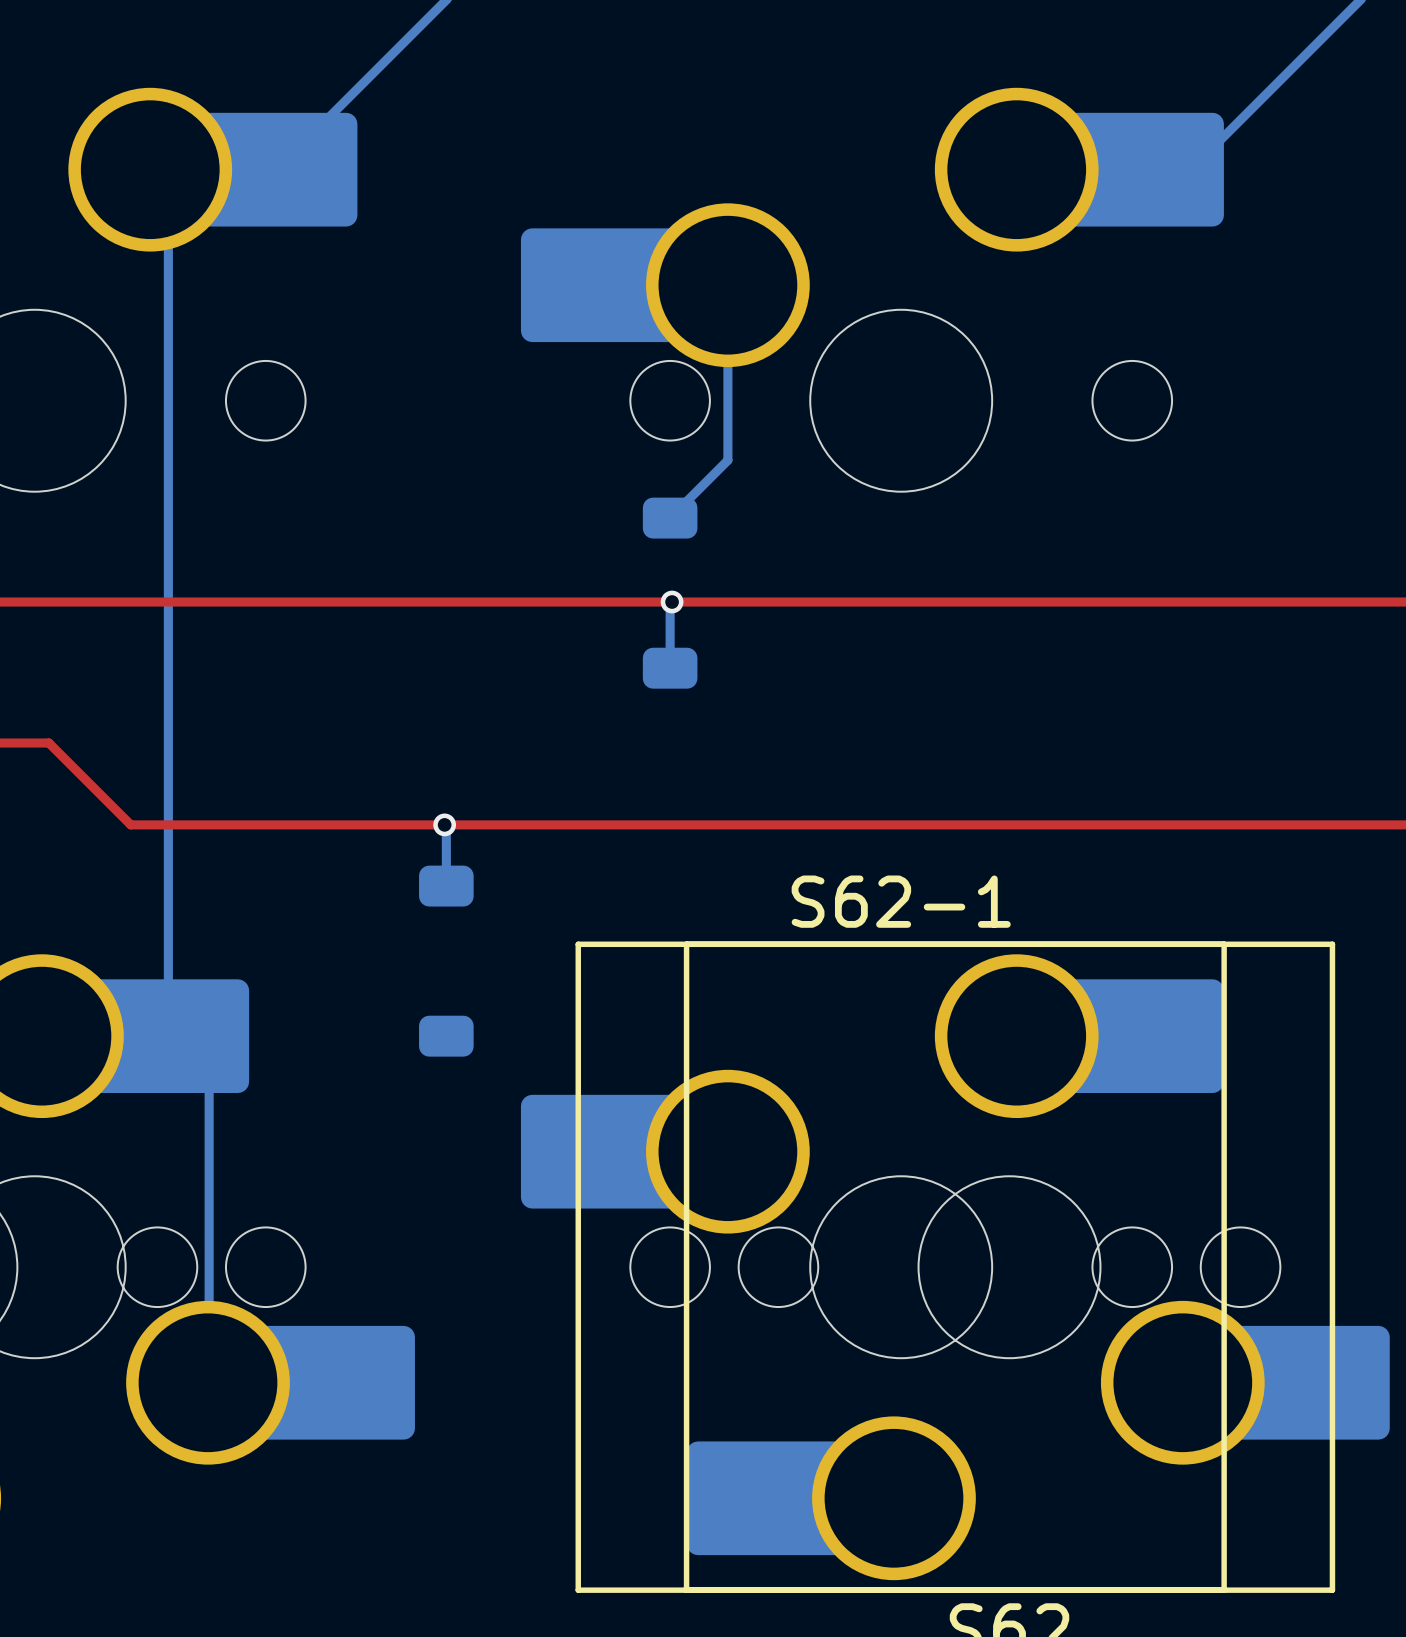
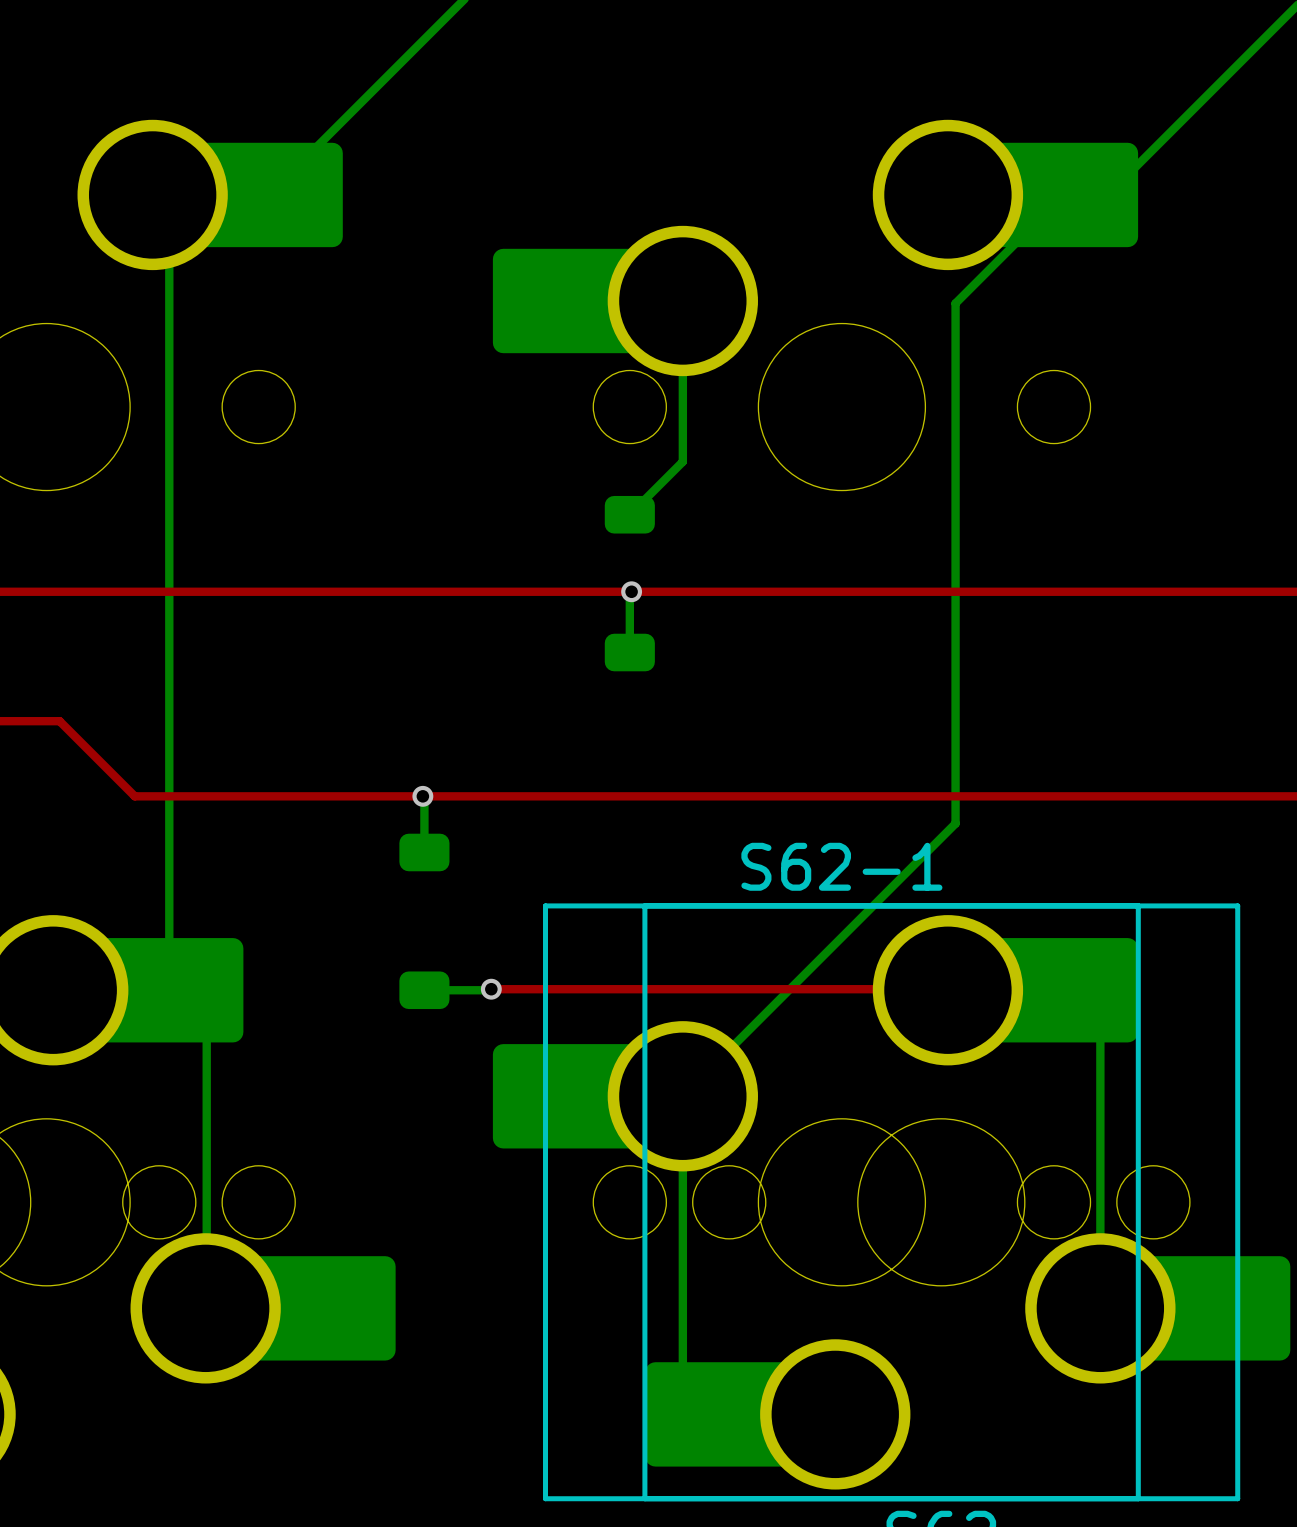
bottom track: none -> (1064, 194) (955, 303) (955, 823) (682, 1096) (682, 1378)
top track: none -> (491, 989) (946, 989)
bottom track: none -> (491, 989) (424, 990)
via: none -> (491, 989)
bottom track: none -> (1100, 1026) (1100, 1308)

